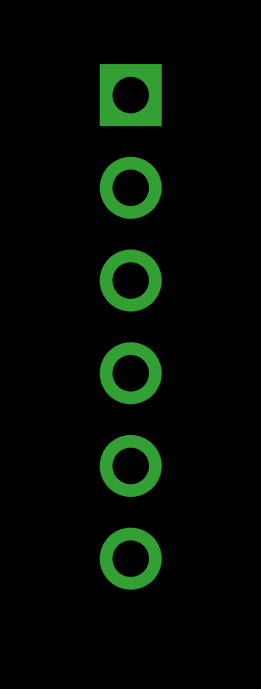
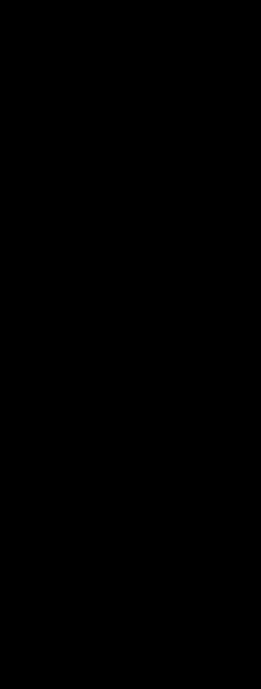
part: (130, 326) -> none

